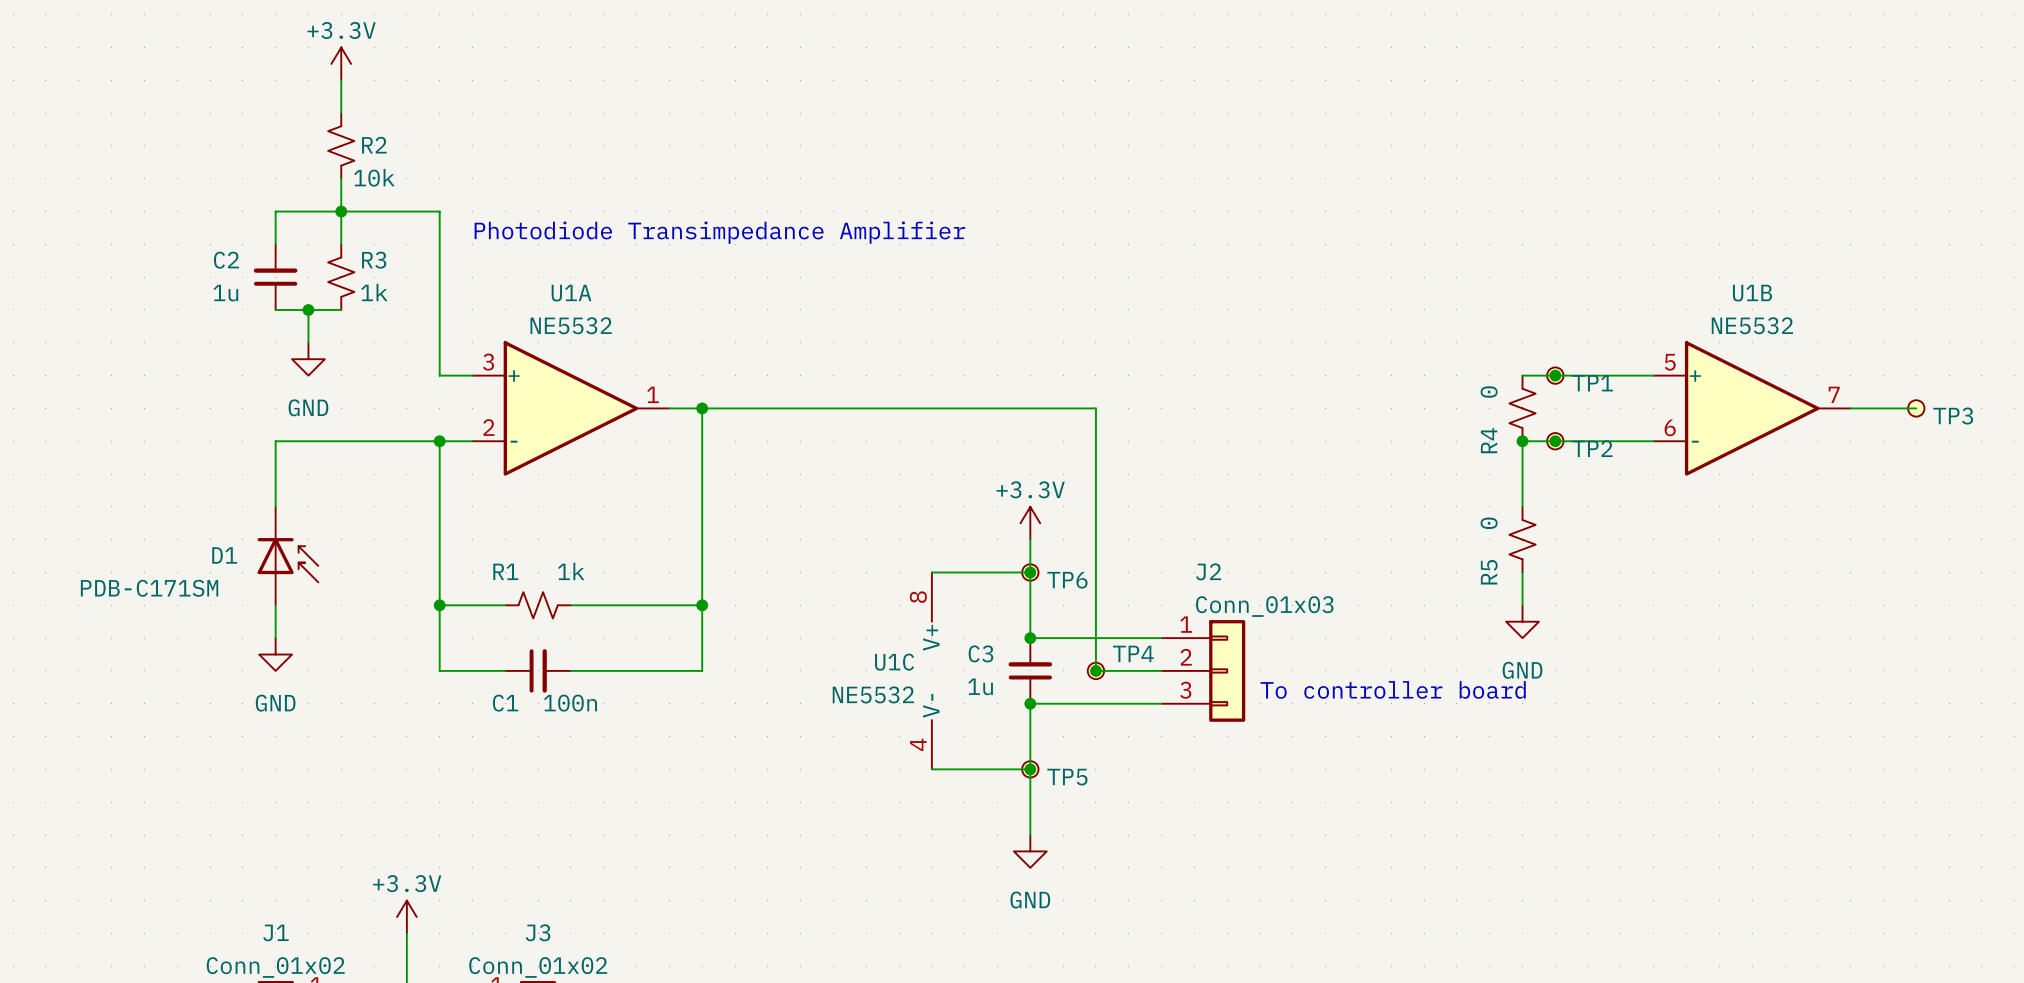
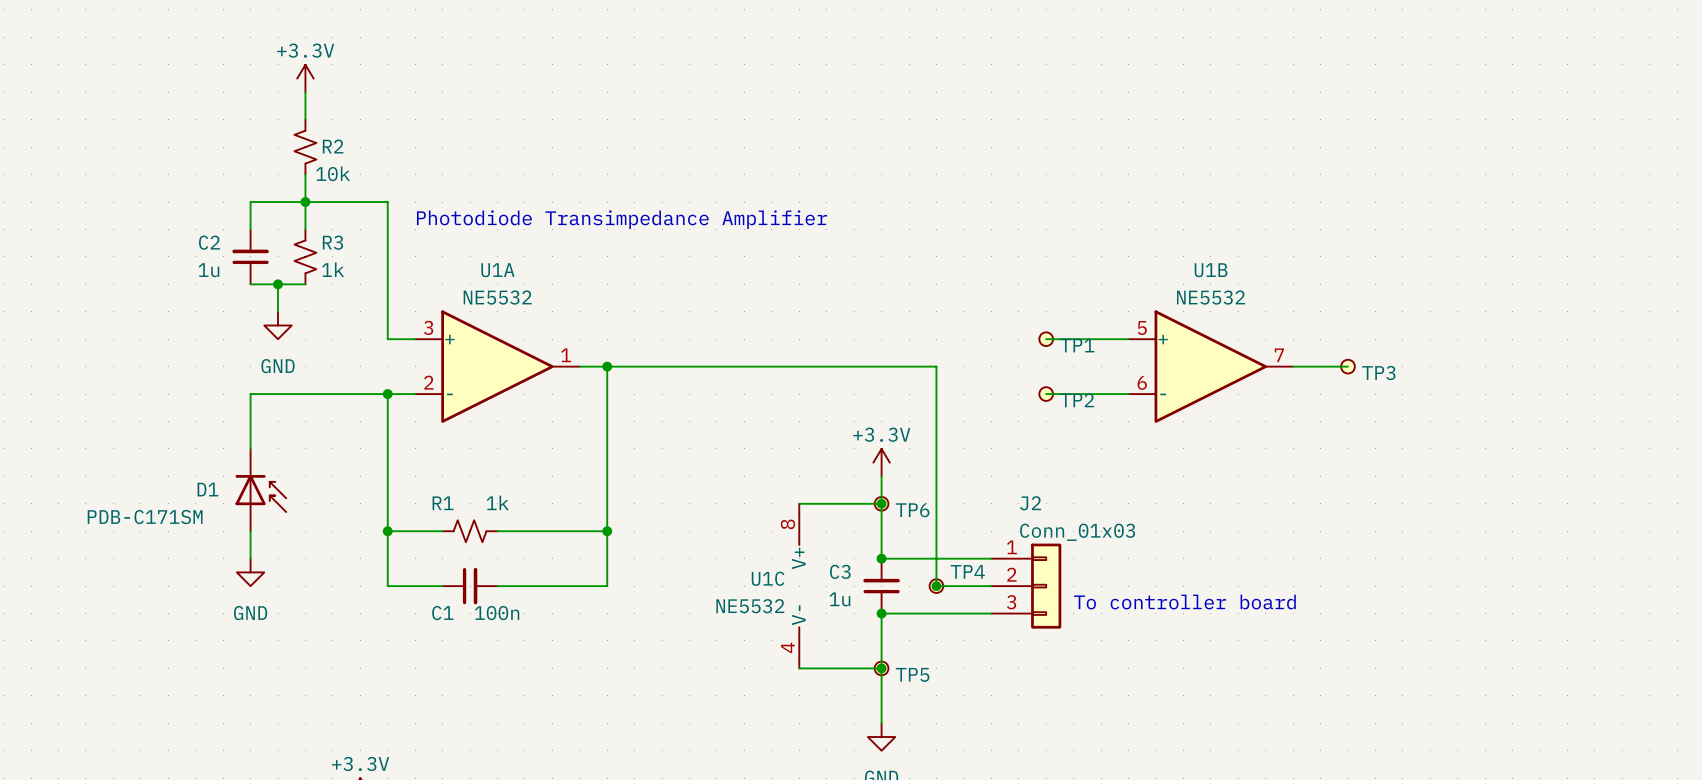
wire: none -> (1046, 339) (1128, 339)
wire: (1522, 375) (1653, 375) -> none
junction: (1555, 375) -> none
TP1 position: (1555, 375) -> (1046, 339)
wire: none -> (1293, 366) (1347, 366)
R4: 0 (1522, 408) -> none
U1B position: (1752, 408) -> (1210, 366)
wire: (1850, 408) (1916, 408) -> none
TP3 position: (1916, 408) -> (1347, 366)
wire: none -> (1046, 394) (1128, 394)
junction: (1522, 441) -> none
junction: (1555, 441) -> none
TP2 position: (1555, 441) -> (1046, 394)
wire: (1653, 441) (1522, 441) (1522, 506) -> none
R5: 0 (1522, 539) -> none
wire: (1522, 572) (1522, 605) -> none
power symbol: GND (1522, 621) -> none

